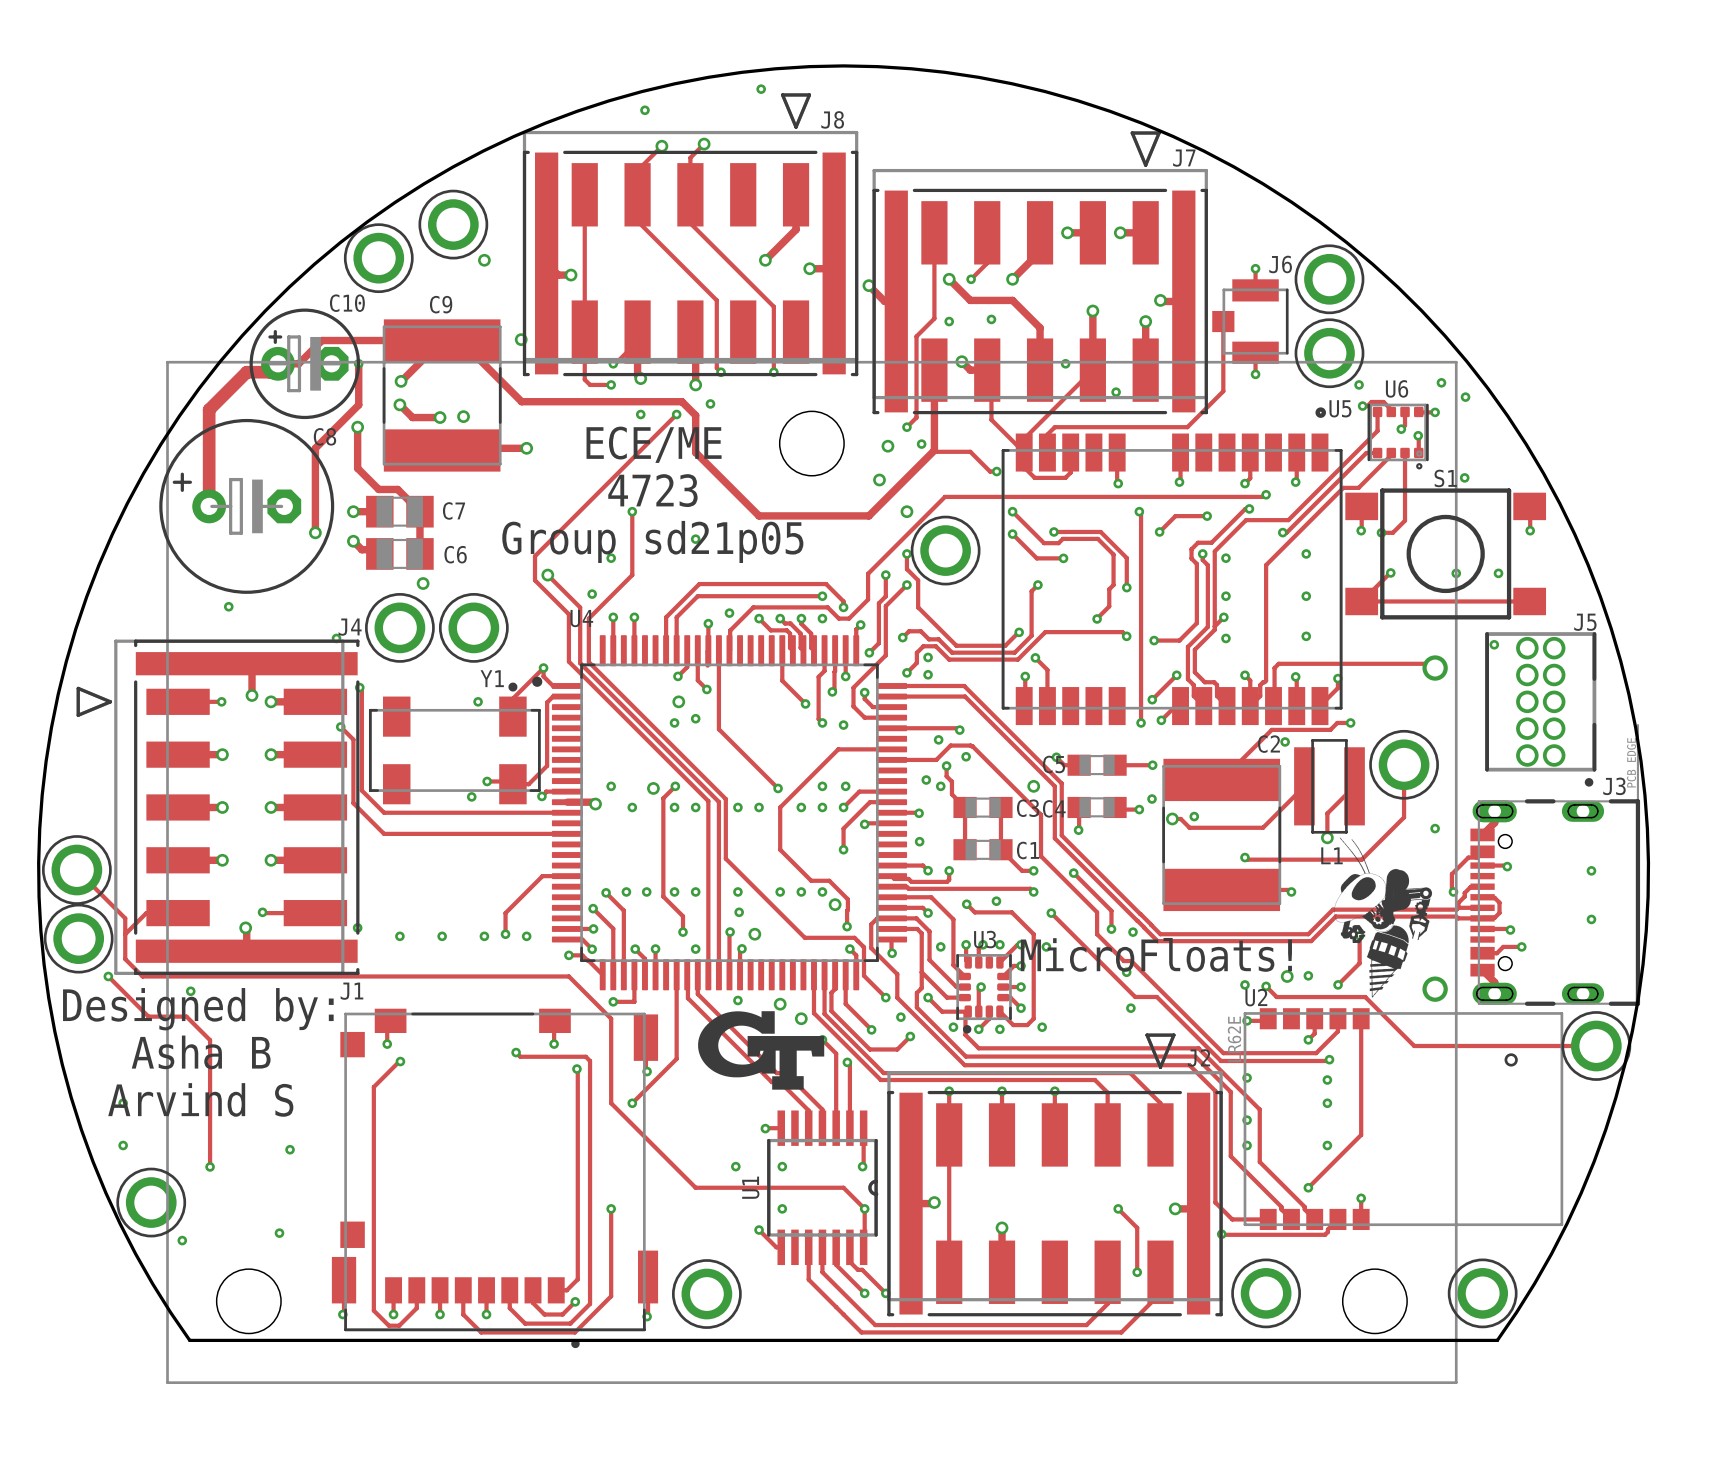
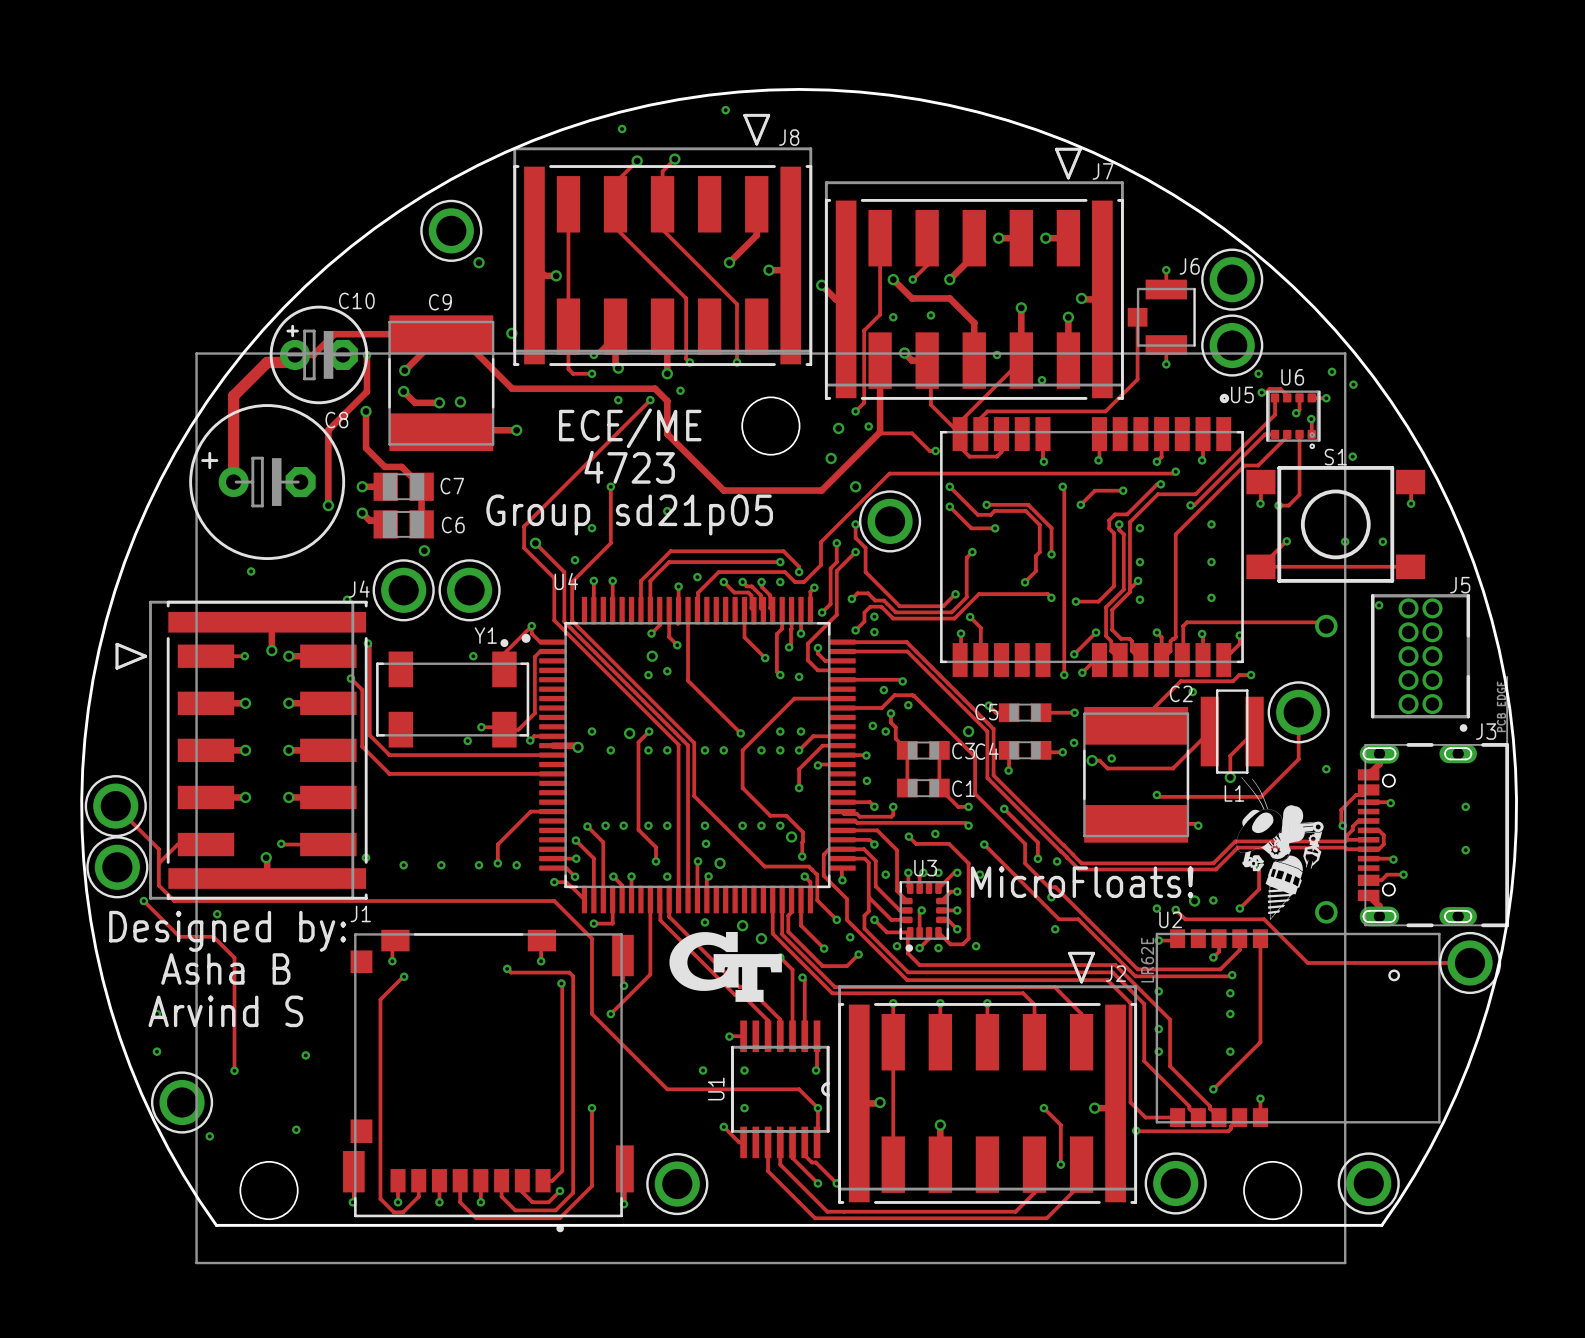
part: (378, 258) -> none

